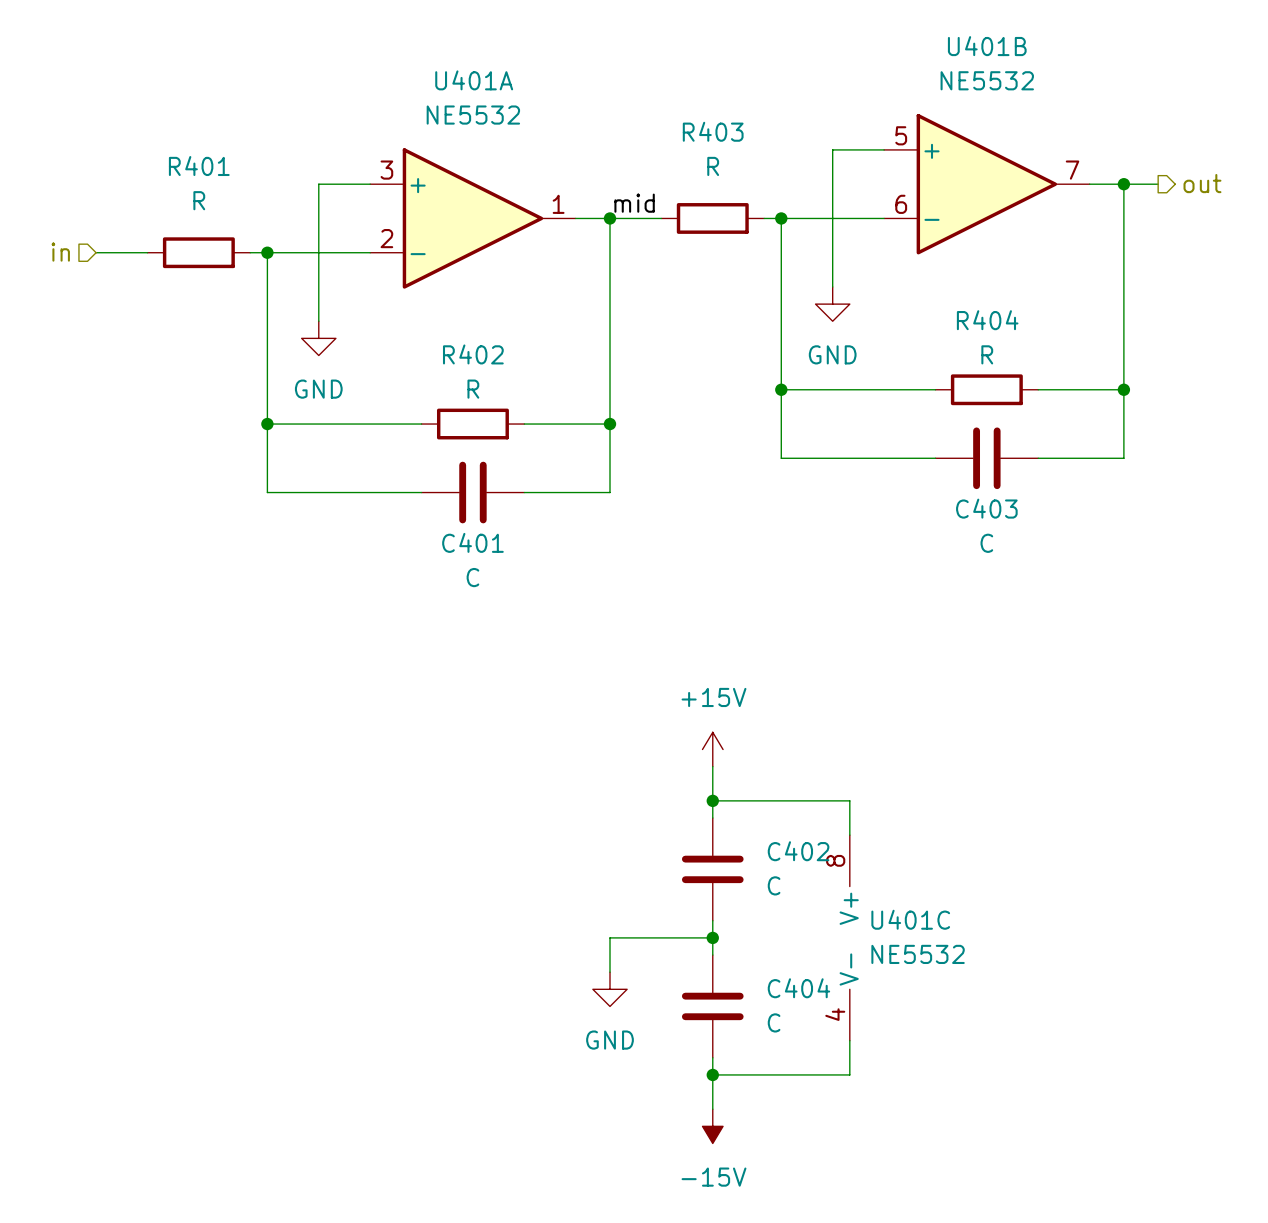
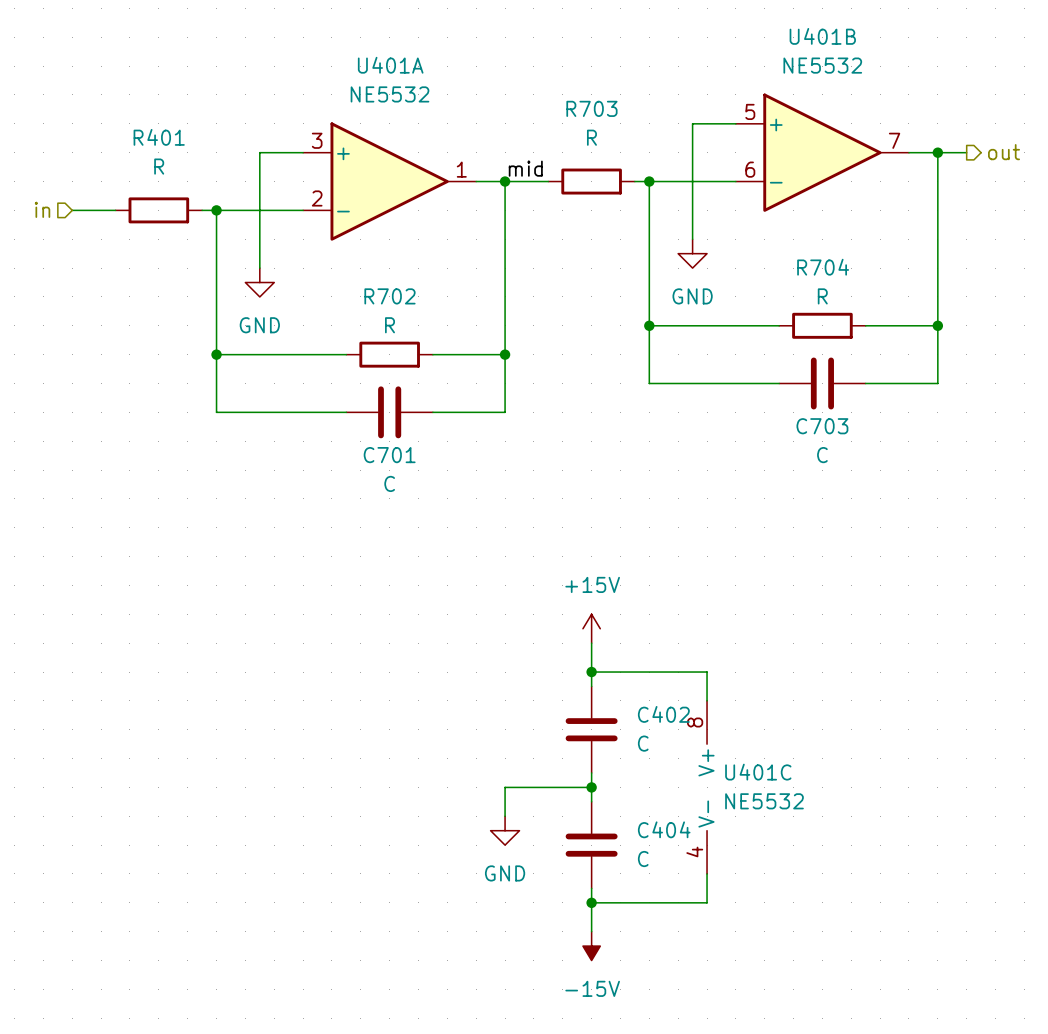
R403 name: R403 (713, 131) -> R703 (591, 108)
R404 name: R404 (987, 320) -> R704 (823, 267)
R402 name: R402 (473, 354) -> R702 (389, 296)
C403 name: C403 (986, 508) -> C703 (822, 426)
C401 name: C401 (472, 542) -> C701 (389, 455)

